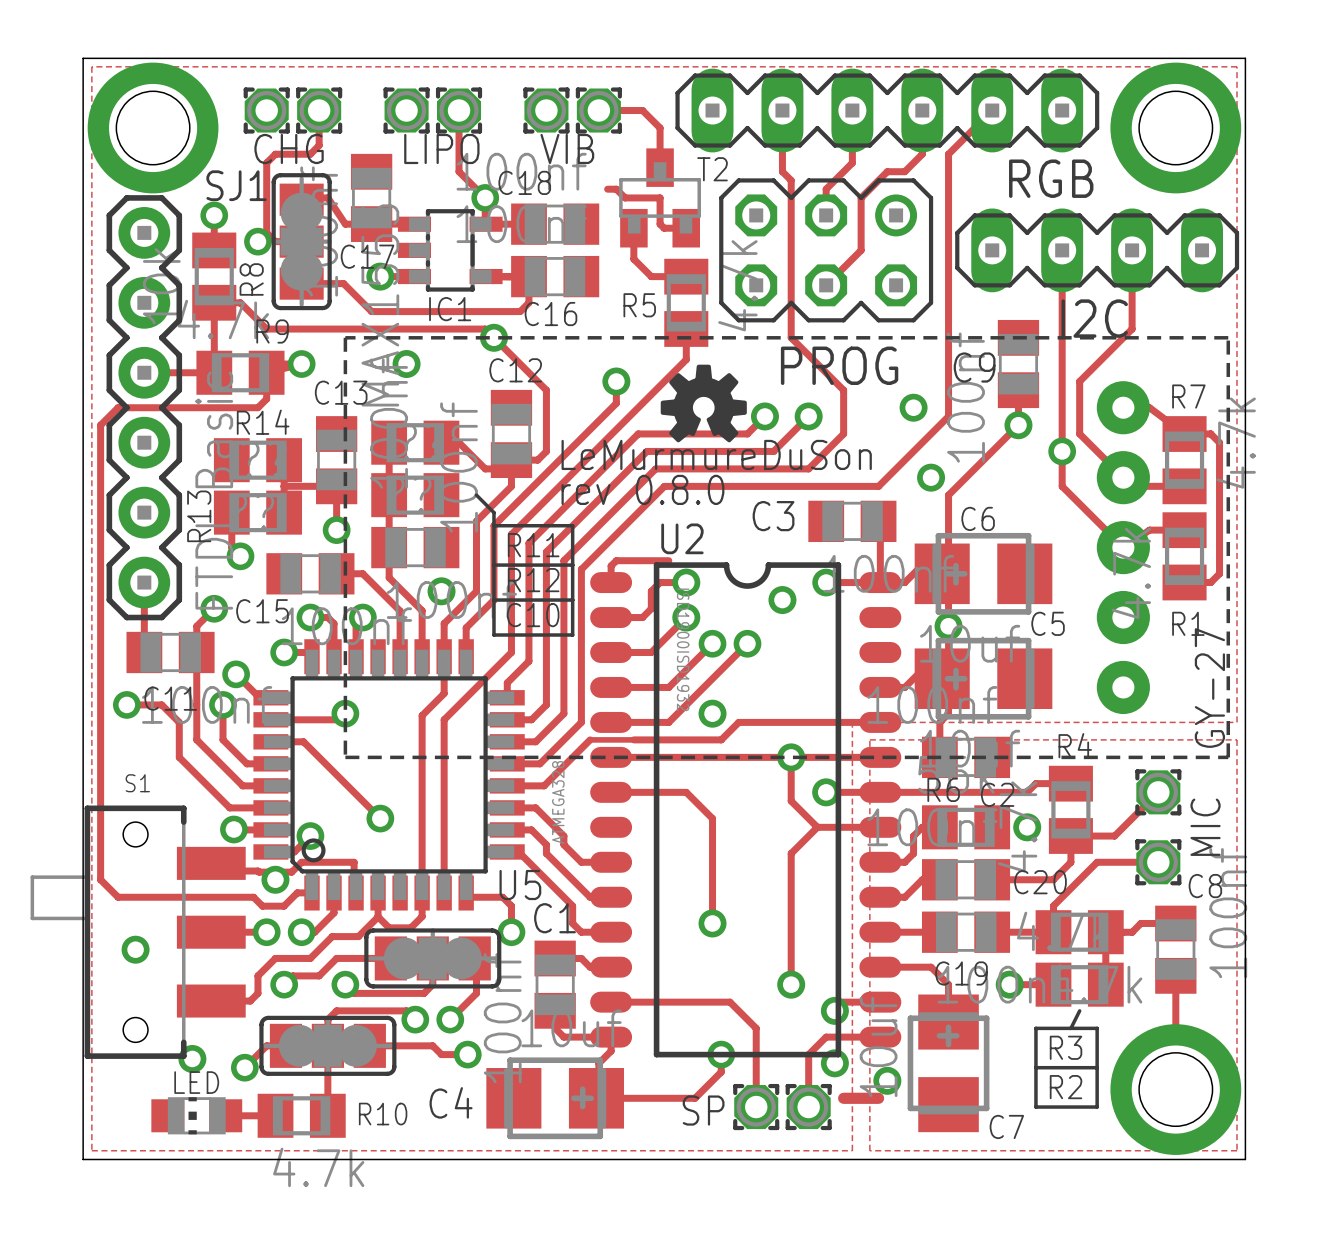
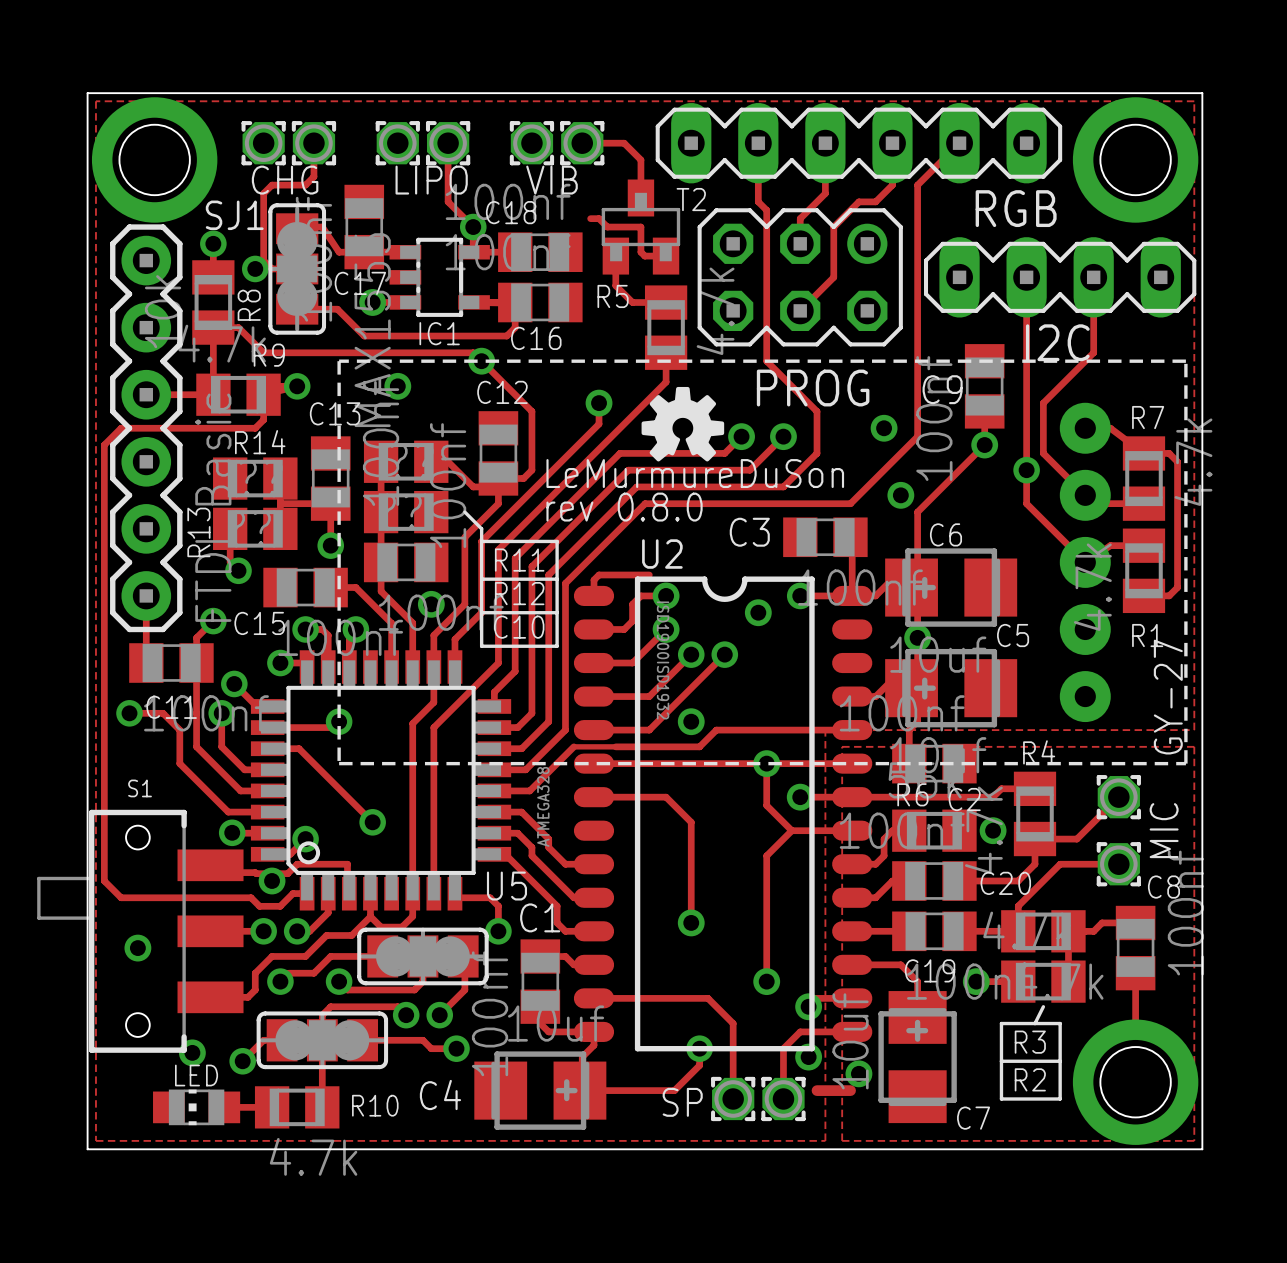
R5 name position: R5 (639, 305) -> R5 (613, 296)

